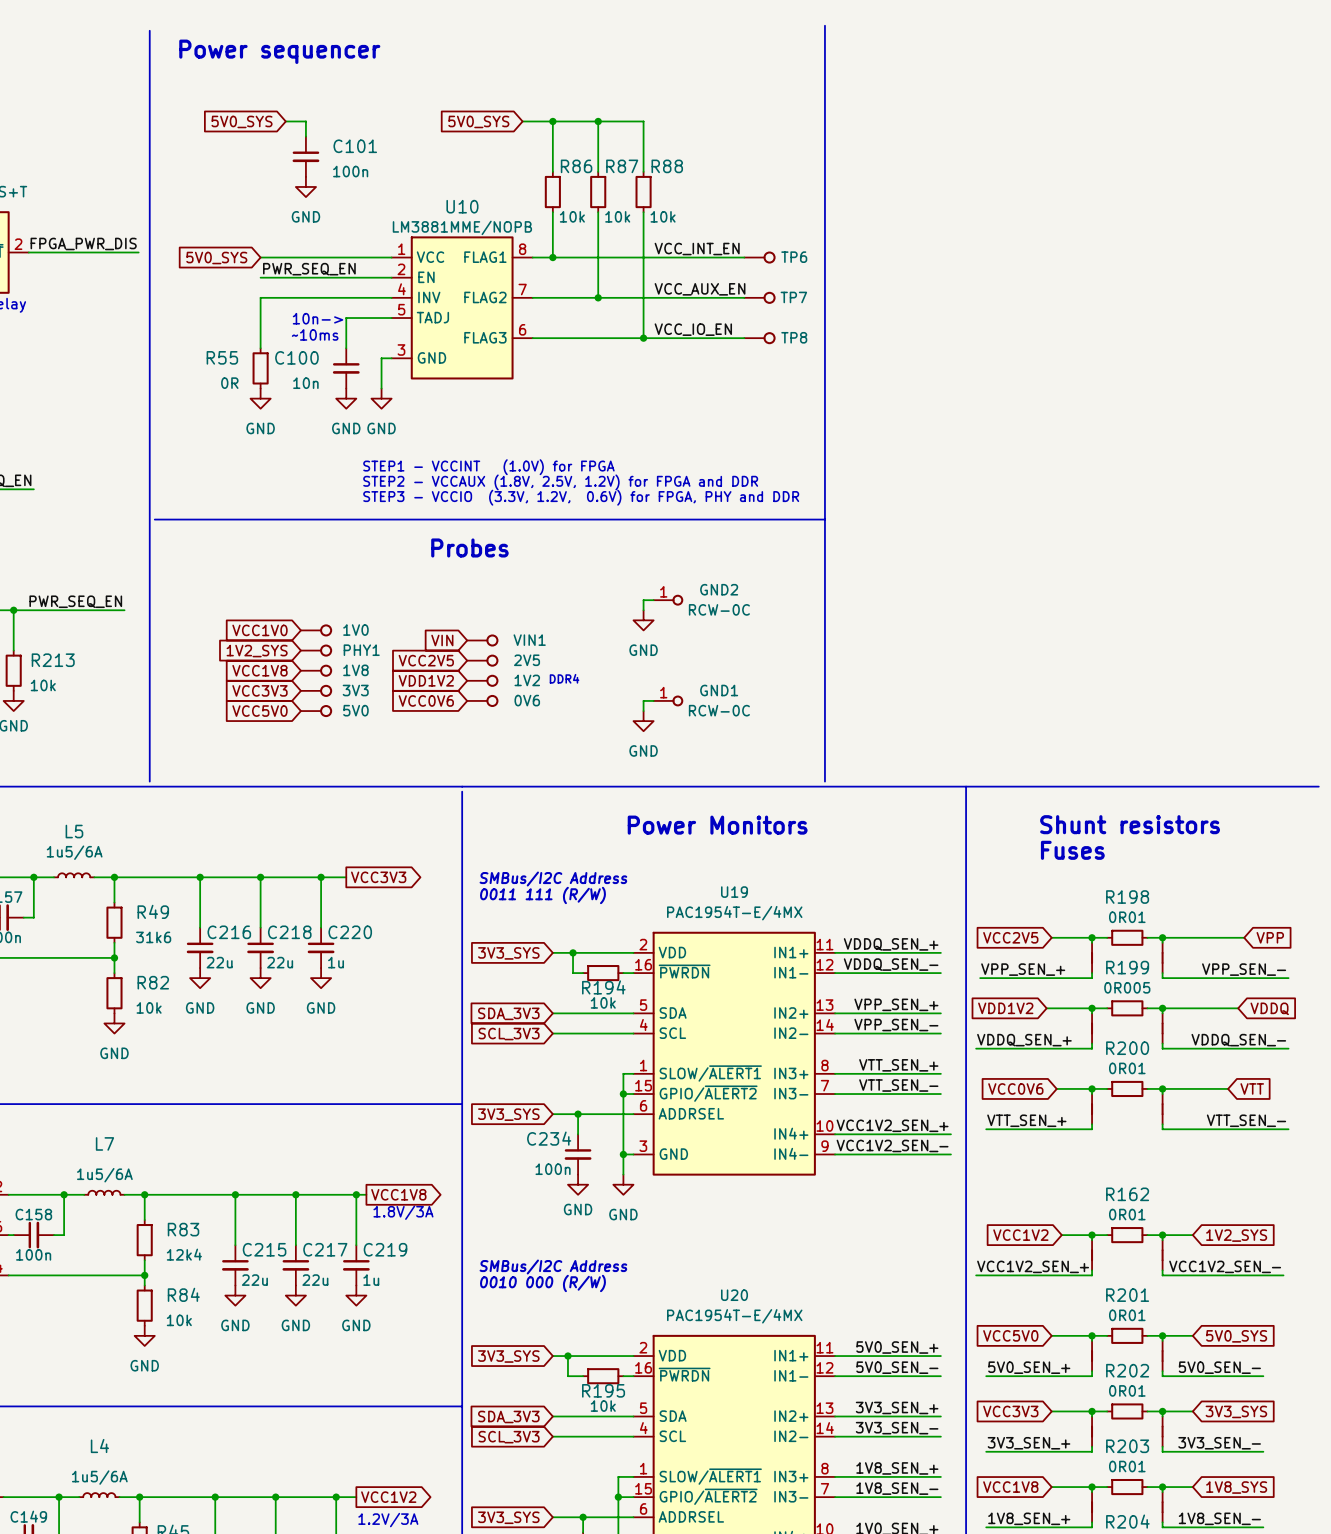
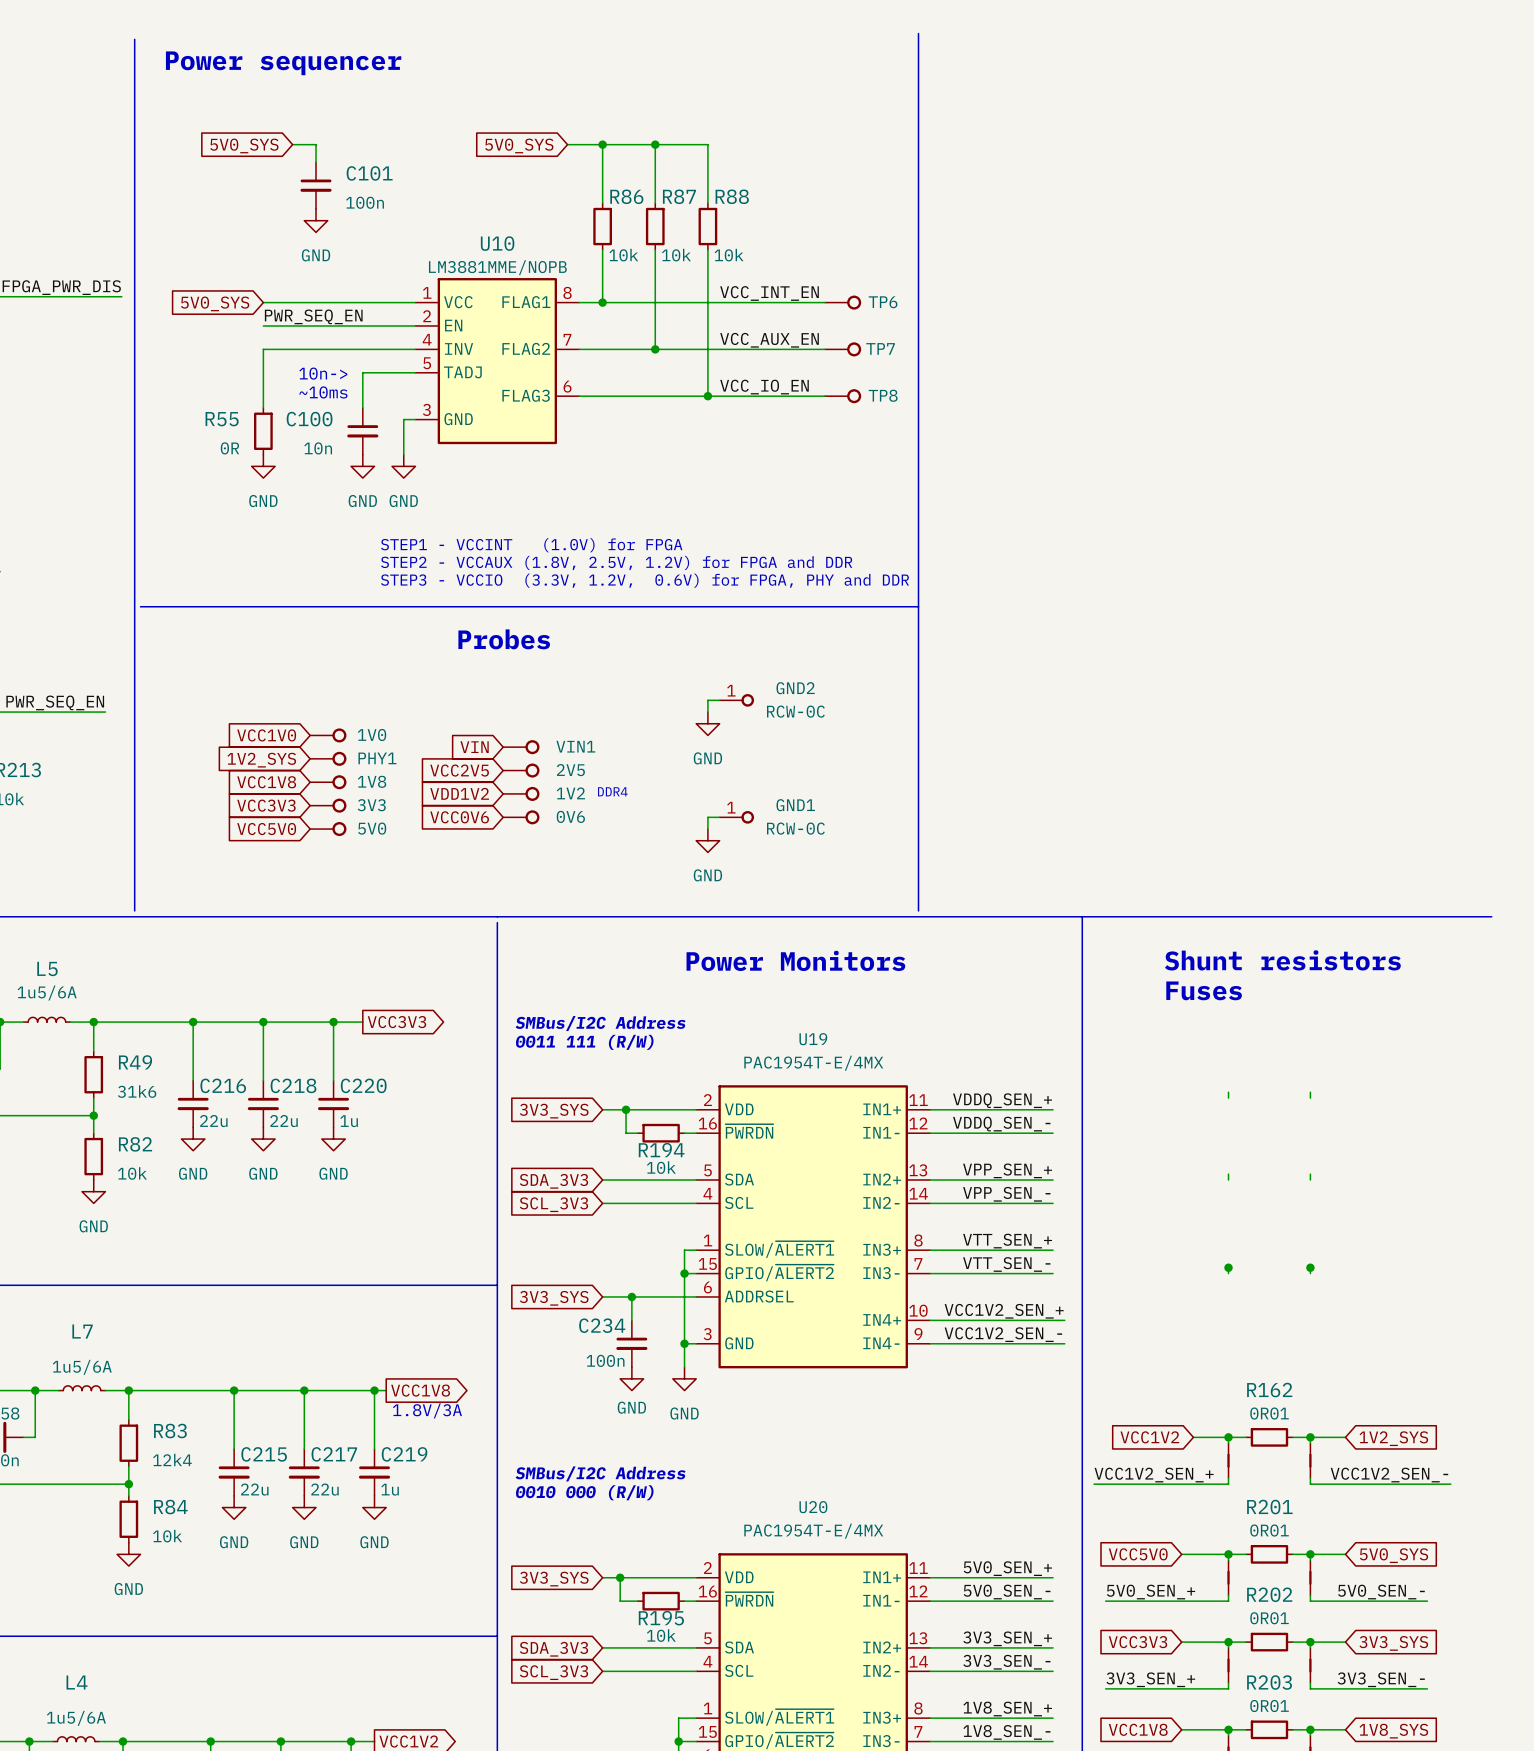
global label: VCC2V5 (1010, 937) -> none
wire: (1051, 937) (1107, 937) -> none
junction: (1092, 937) -> none
R198: (1127, 937) -> none
wire: (1147, 937) (1244, 937) -> none
junction: (1162, 937) -> none
global label: VPP (1270, 937) -> none
part: (1092, 957) -> none
part: (1162, 957) -> none
label: VPP_SEN_+ (1023, 969) -> none
label: VPP_SEN_- (1244, 969) -> none
wire: (1092, 973) (1092, 978) (980, 978) -> none
wire: (1162, 973) (1162, 978) (1288, 978) -> none
global label: VDD1V2 (1005, 1008) -> none
wire: (1046, 1008) (1107, 1008) -> none
junction: (1092, 1008) -> none
R199: (1127, 1008) -> none
wire: (1147, 1008) (1238, 1008) -> none
junction: (1162, 1008) -> none
global label: VDDQ (1269, 1008) -> none
part: (1092, 1028) -> none
part: (1162, 1028) -> none
label: VDDQ_SEN_+ (1024, 1040) -> none
label: VDDQ_SEN_- (1238, 1040) -> none
wire: (1092, 1043) (1092, 1048) (976, 1048) -> none
wire: (1162, 1043) (1162, 1048) (1288, 1048) -> none
global label: VCC0V6 (1015, 1088) -> none
wire: (1056, 1088) (1107, 1088) -> none
R200: (1127, 1088) -> none
wire: (1147, 1088) (1228, 1088) -> none
global label: VTT (1252, 1088) -> none
part: (1092, 1109) -> none
part: (1162, 1109) -> none
label: VTT_SEN_+ (1026, 1120) -> none
label: VTT_SEN_- (1246, 1120) -> none
wire: (1092, 1124) (1092, 1129) (986, 1129) -> none
wire: (1162, 1124) (1162, 1129) (1288, 1129) -> none

